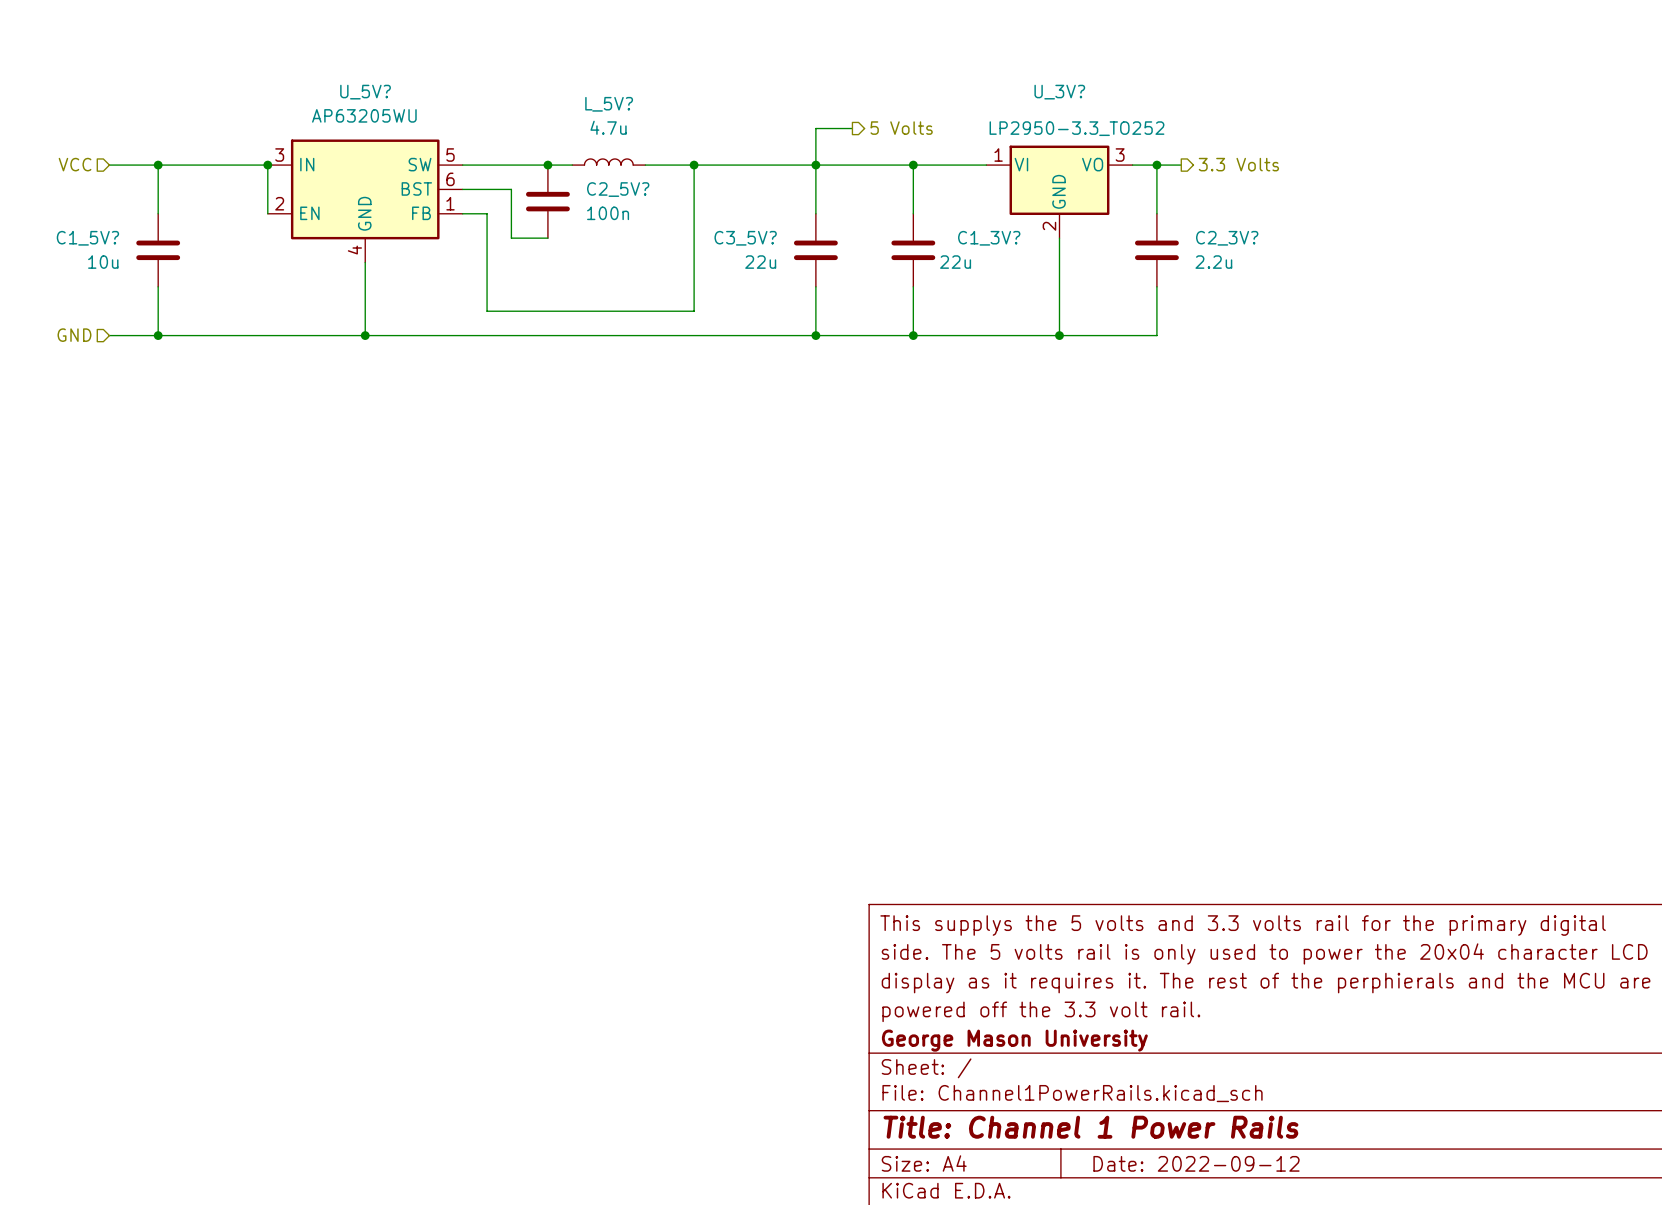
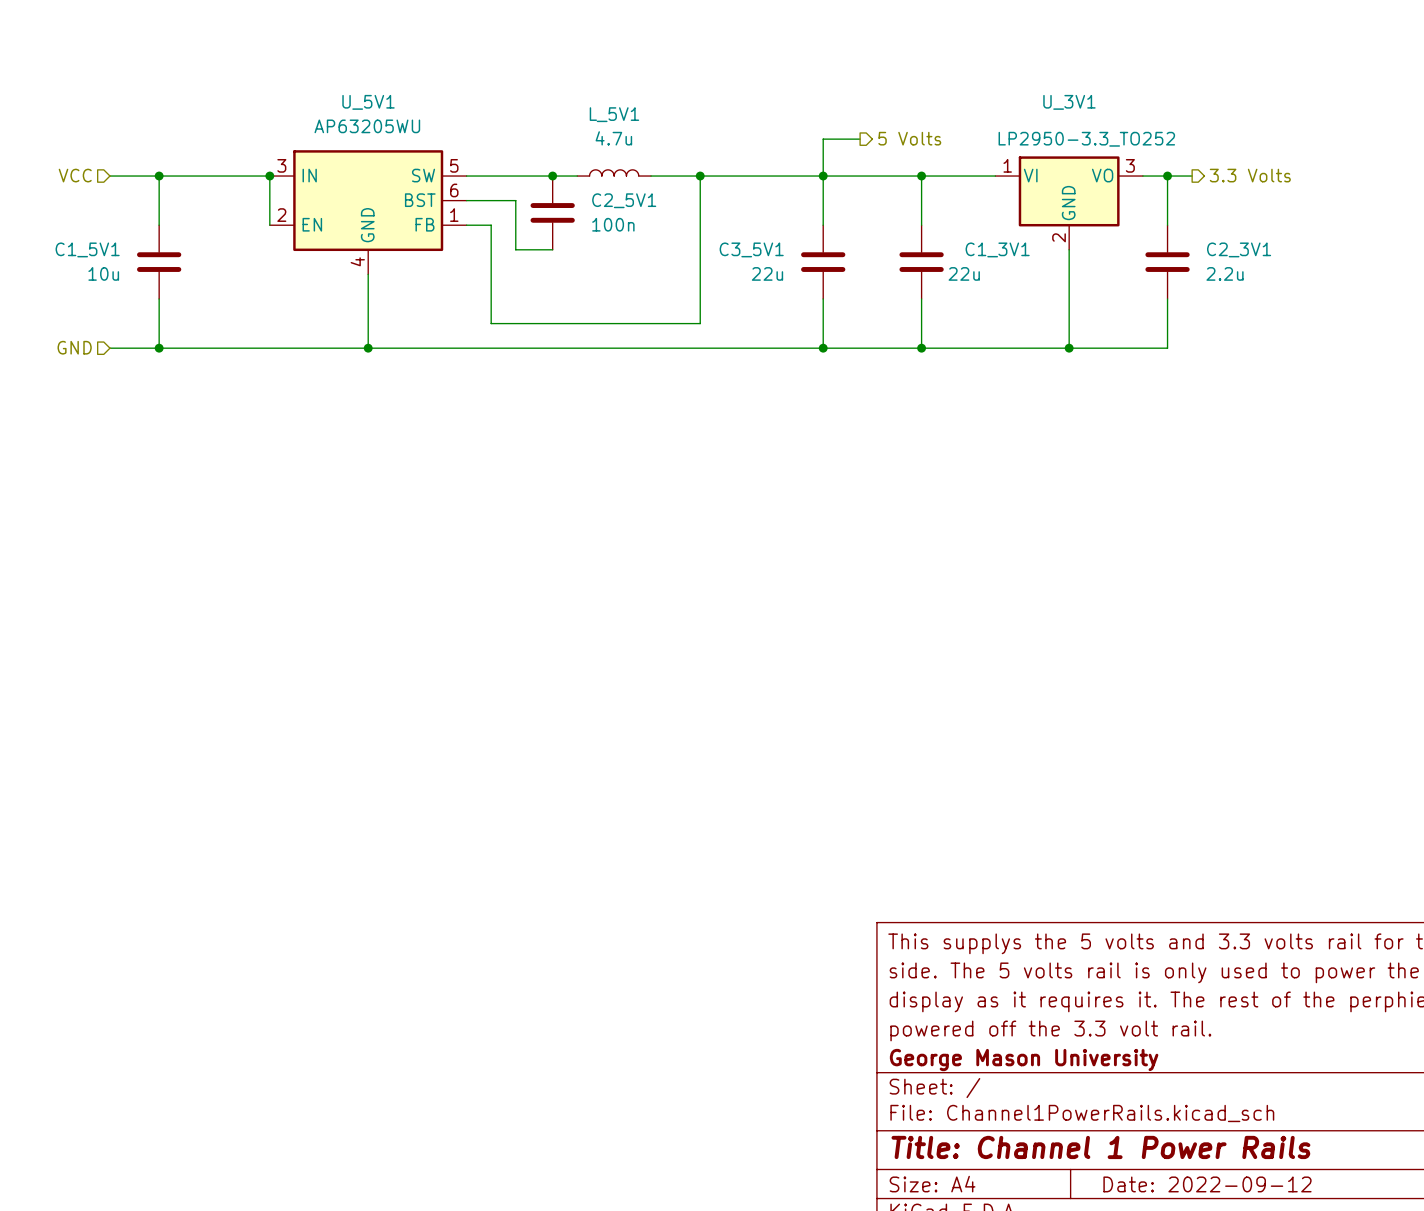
U_5V? name: U_5V? (365, 92) -> U_5V1 (368, 102)
U_3V? name: U_3V? (1059, 92) -> U_3V1 (1069, 102)
L_5V? name: L_5V? (609, 104) -> L_5V1 (614, 114)
C2_5V? name: C2_5V? (618, 189) -> C2_5V1 (624, 200)
C1_5V? name: C1_5V? (87, 238) -> C1_5V1 (87, 249)
C3_5V? name: C3_5V? (745, 238) -> C3_5V1 (751, 249)
C1_3V? name: C1_3V? (989, 238) -> C1_3V1 (997, 249)
C2_3V? name: C2_3V? (1227, 238) -> C2_3V1 (1239, 249)

